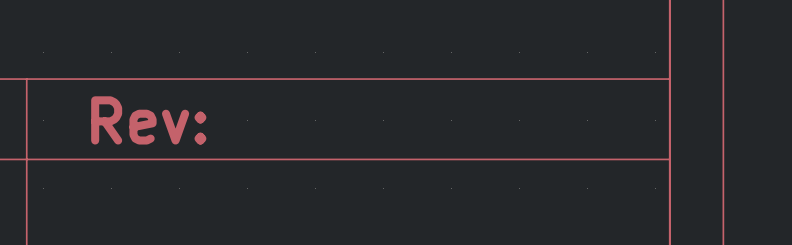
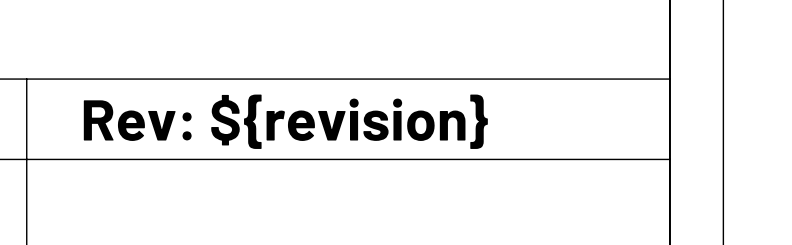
title block: Rev: (148, 120) -> Rev: ${revision} (285, 121)

